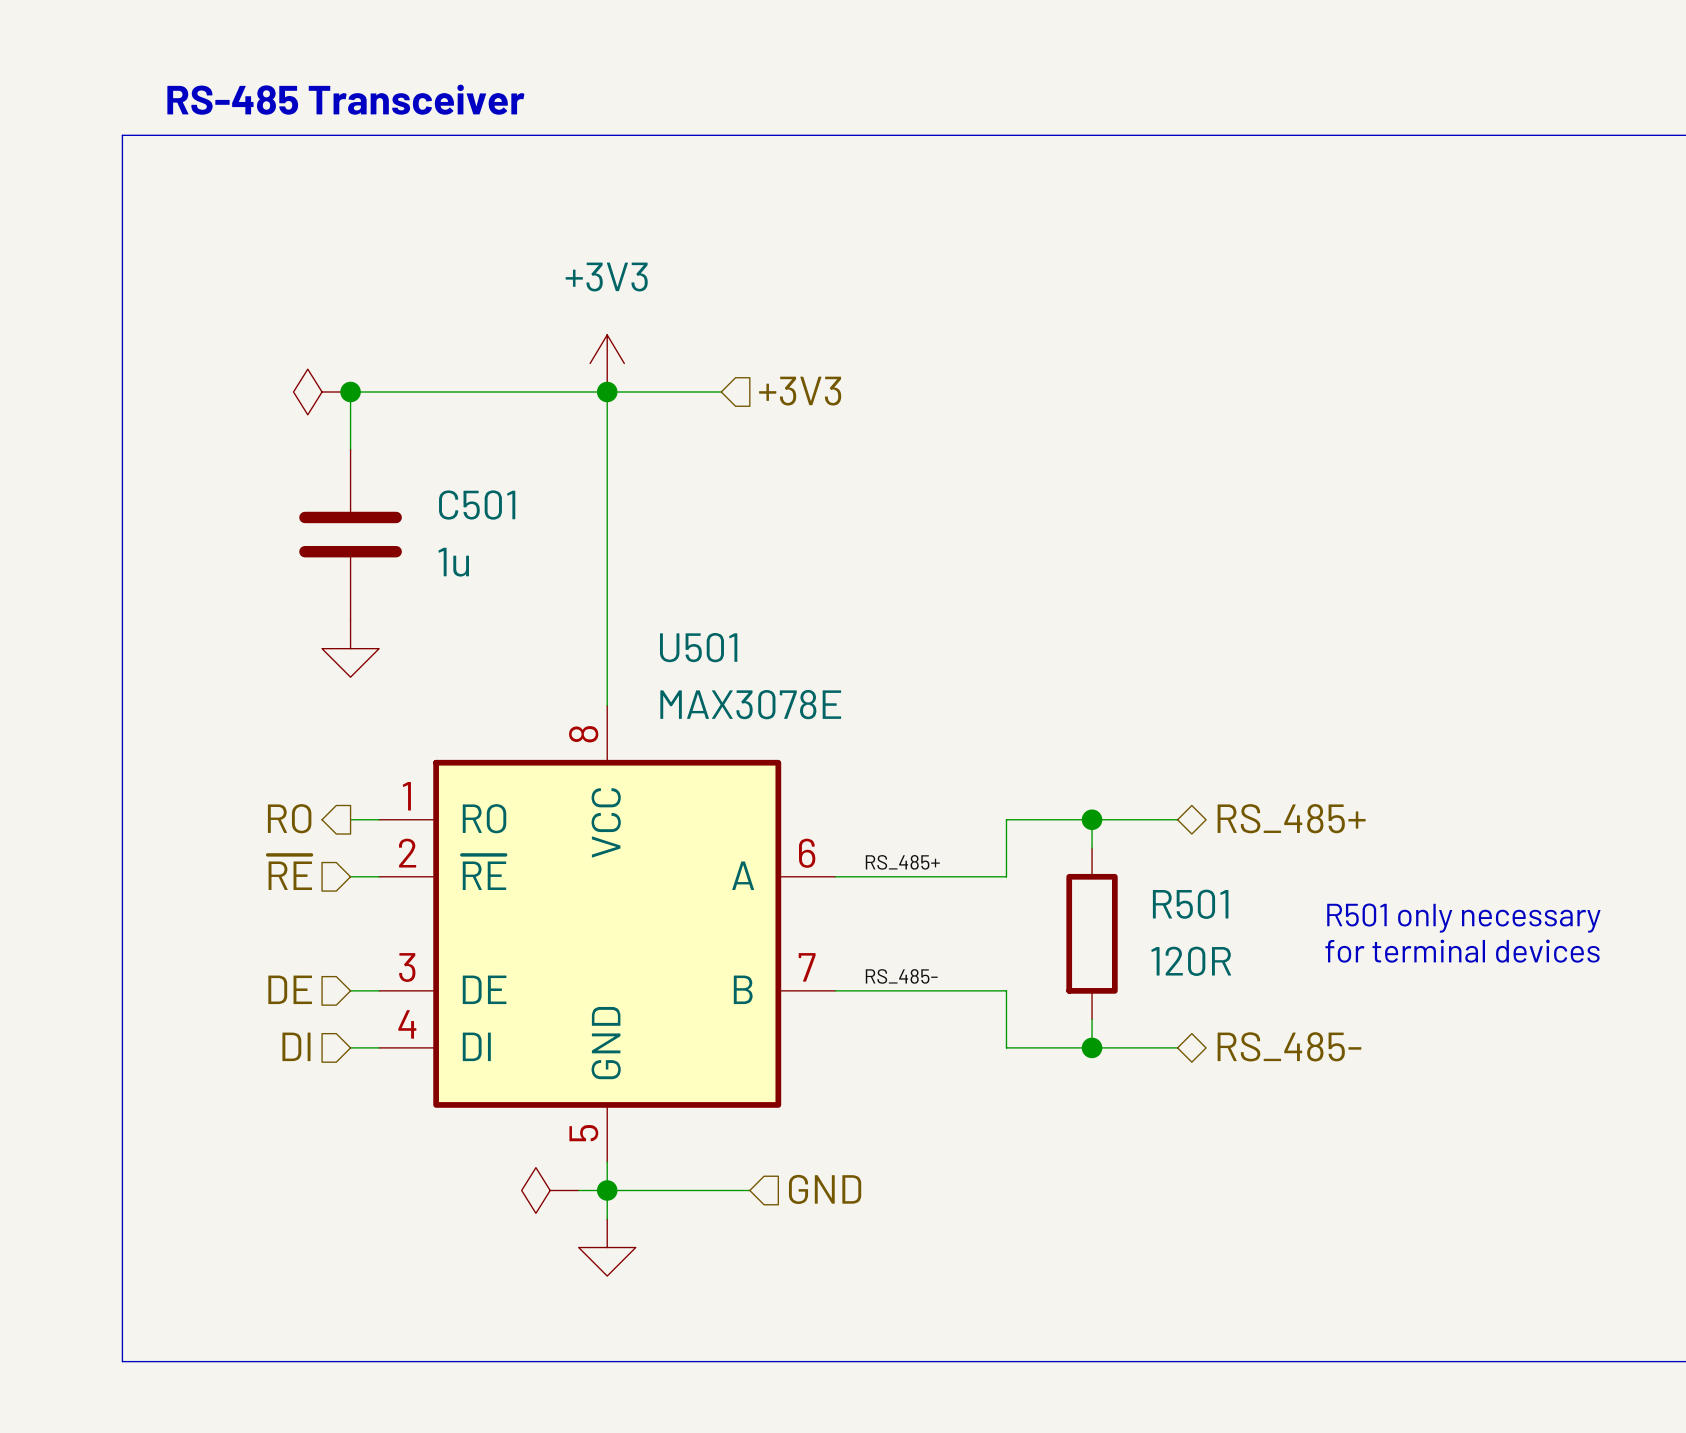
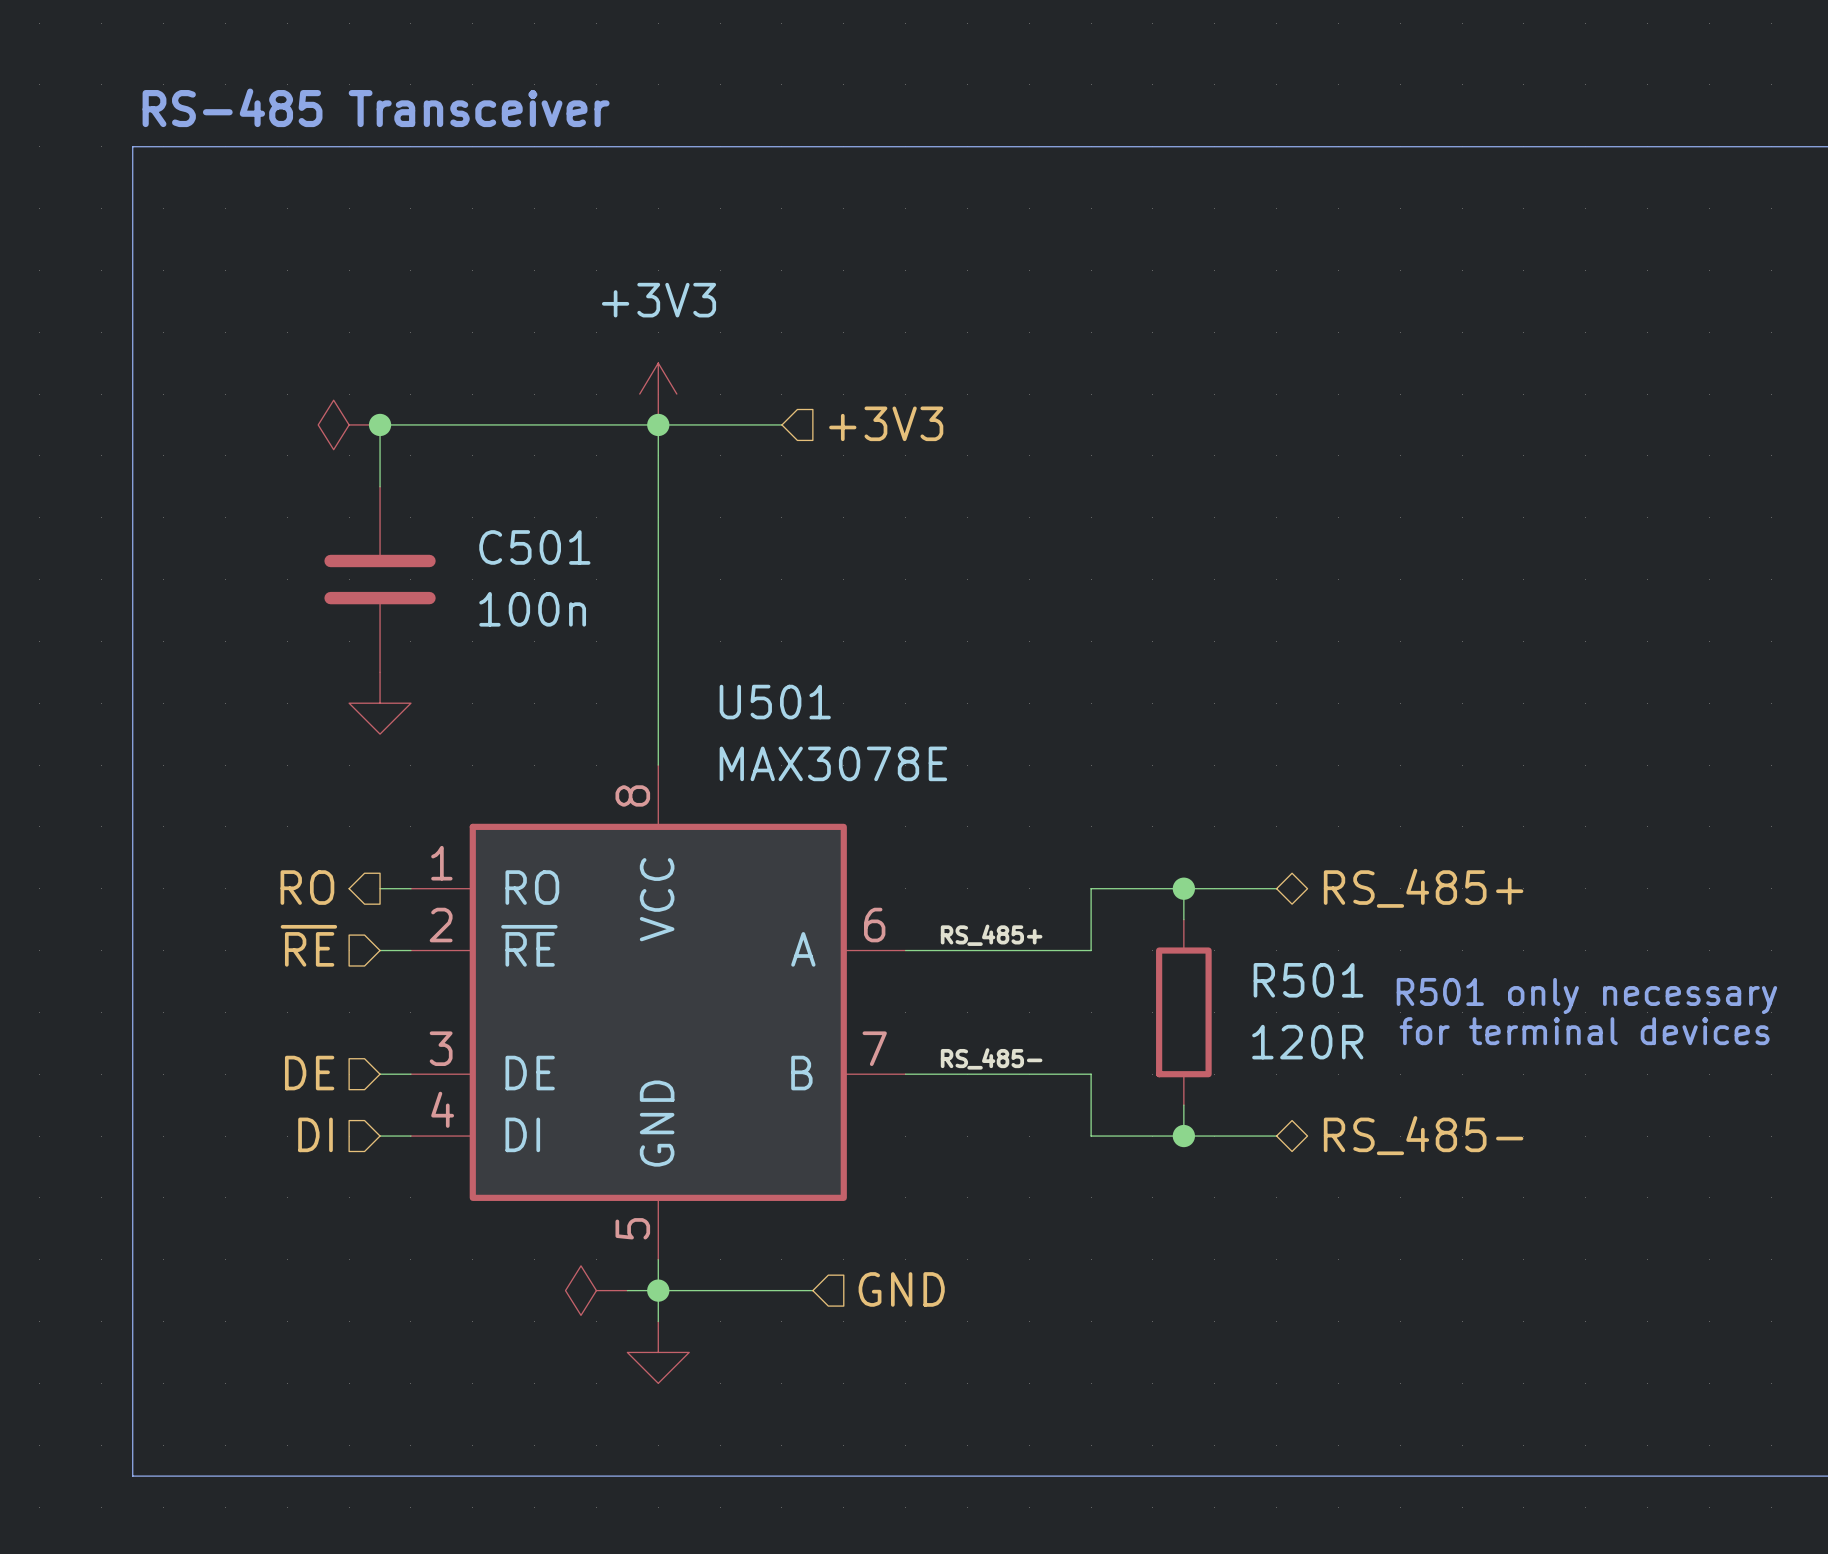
C501 value: 1u (453, 562) -> 100n (532, 609)

